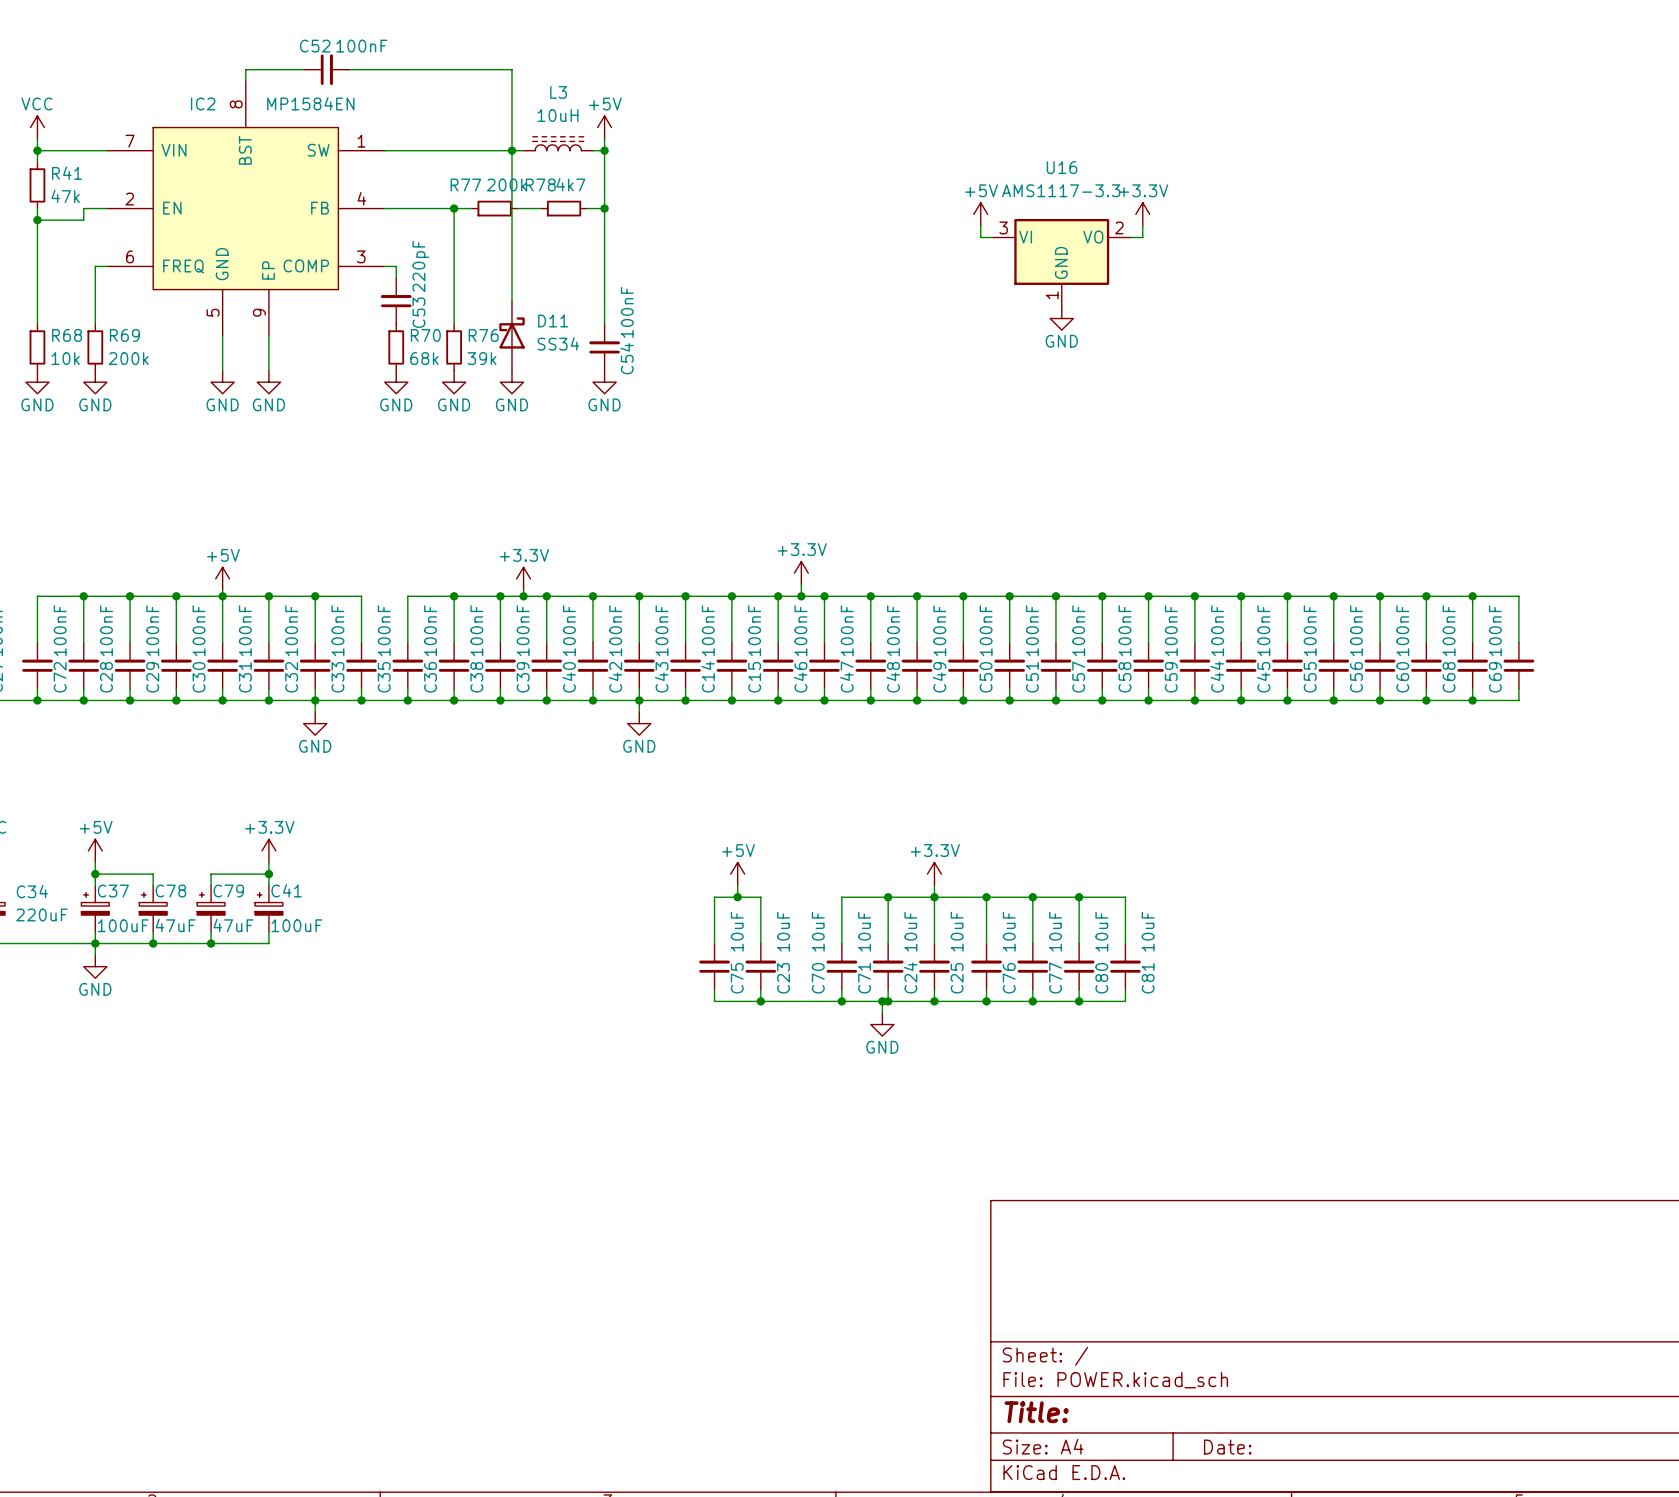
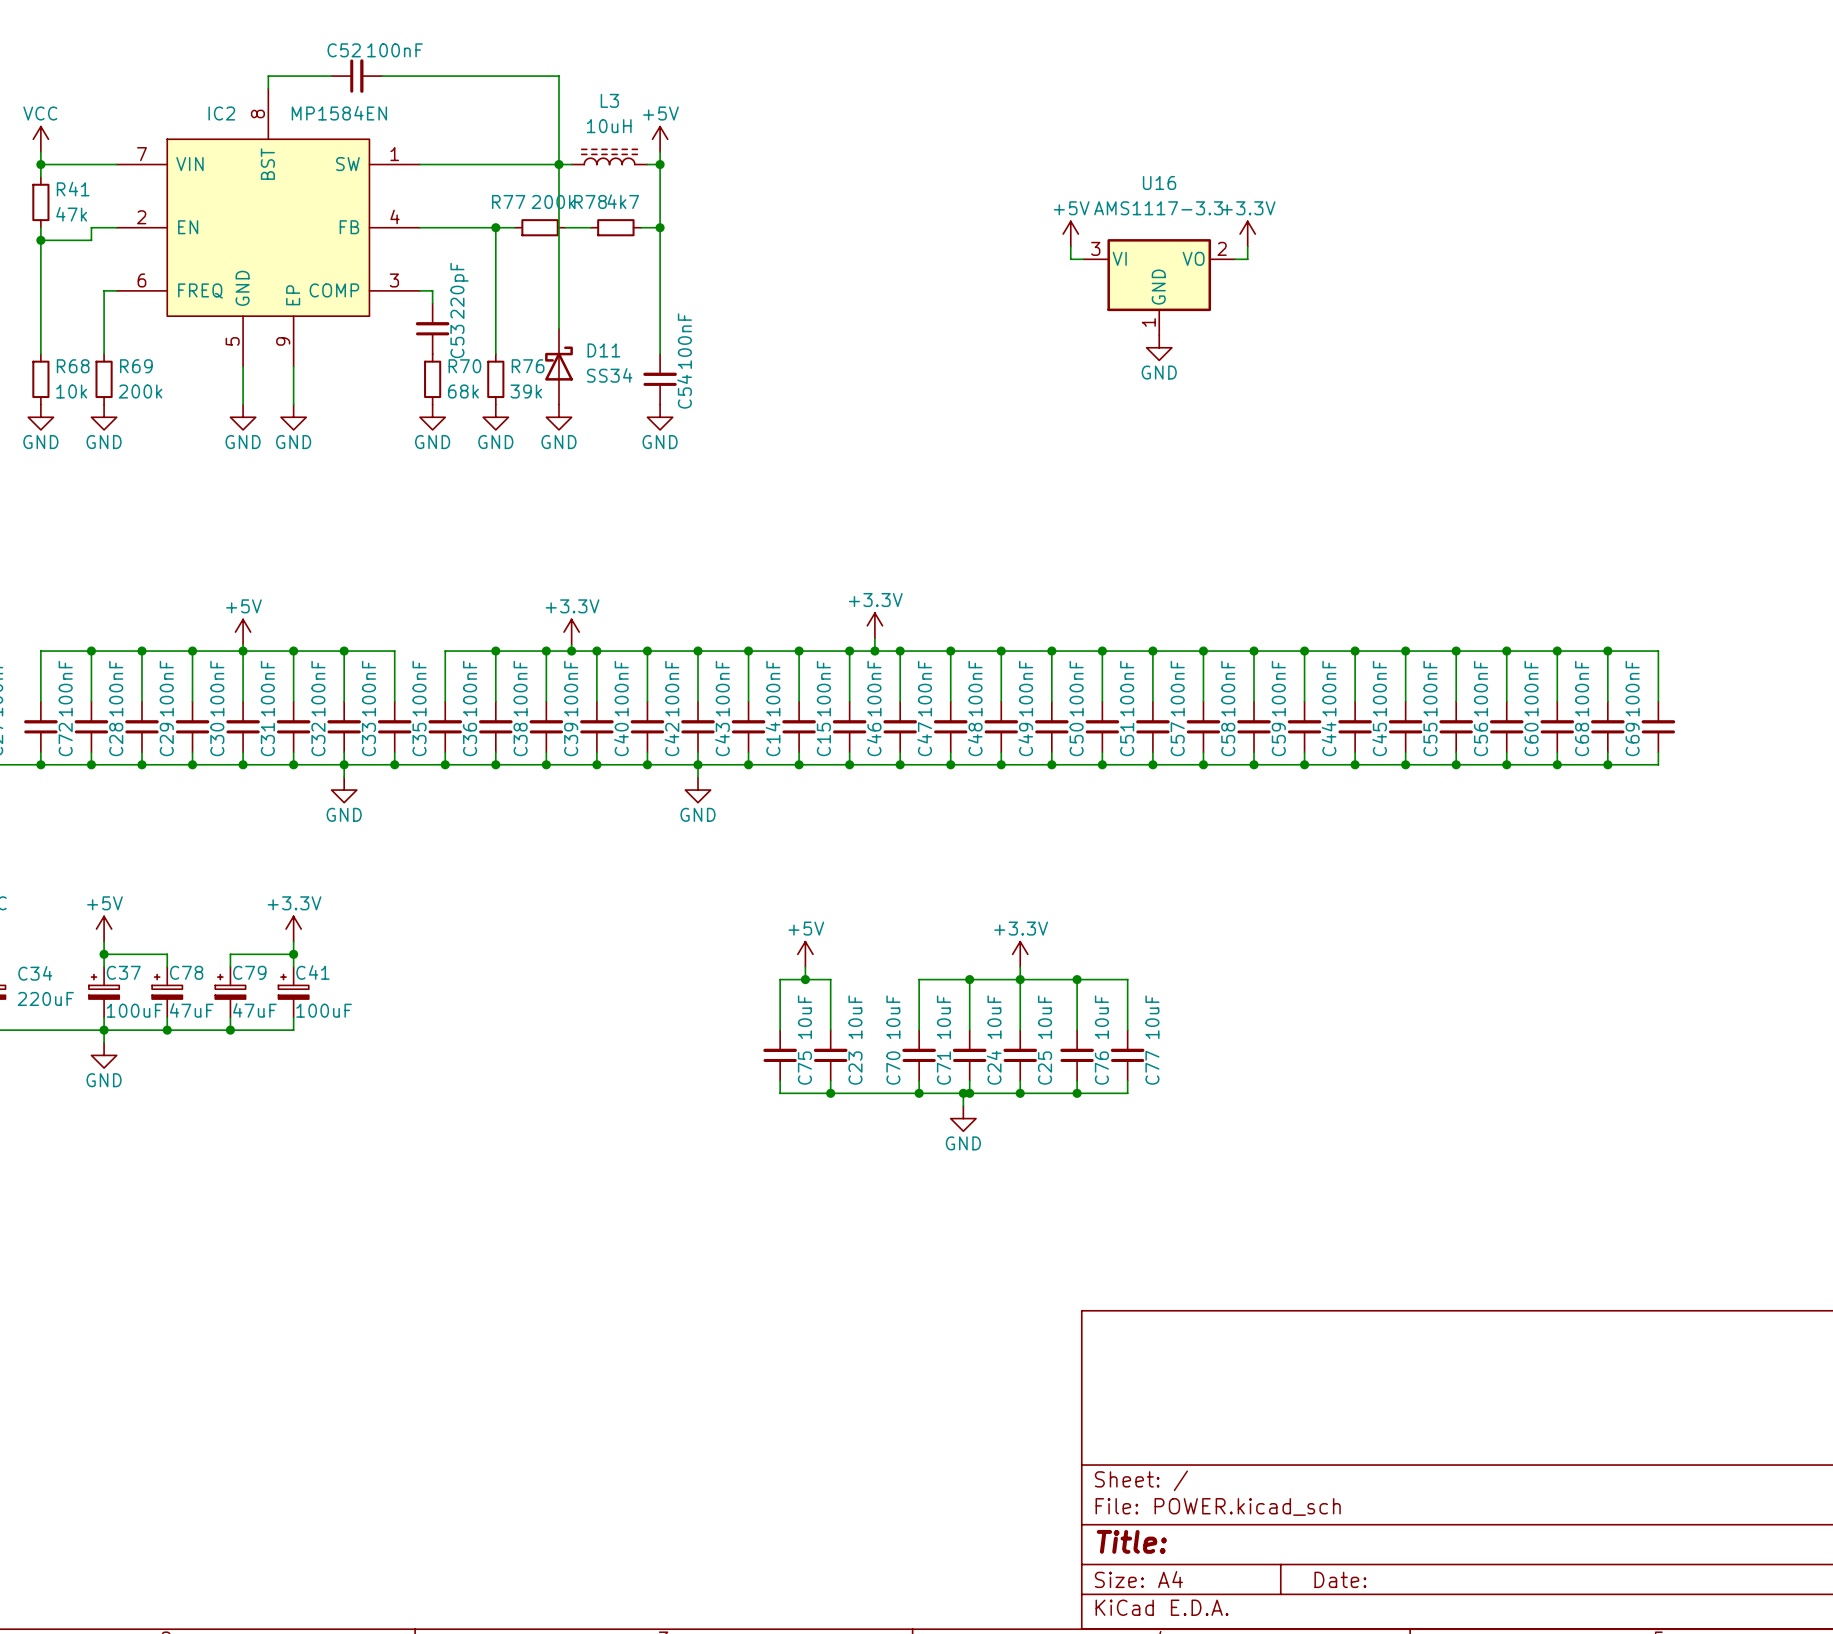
wire: (1032, 897) (1125, 897) (1125, 943) -> none
junction: (1032, 897) -> none
wire: (1079, 897) (1079, 943) -> none
junction: (1079, 897) -> none
C80: 10uF (1079, 966) -> none
C81: 10uF (1125, 966) -> none
wire: (1079, 989) (1079, 1001) -> none
wire: (1125, 989) (1125, 1001) (1032, 1001) -> none
junction: (1032, 1001) -> none
junction: (1079, 1001) -> none

